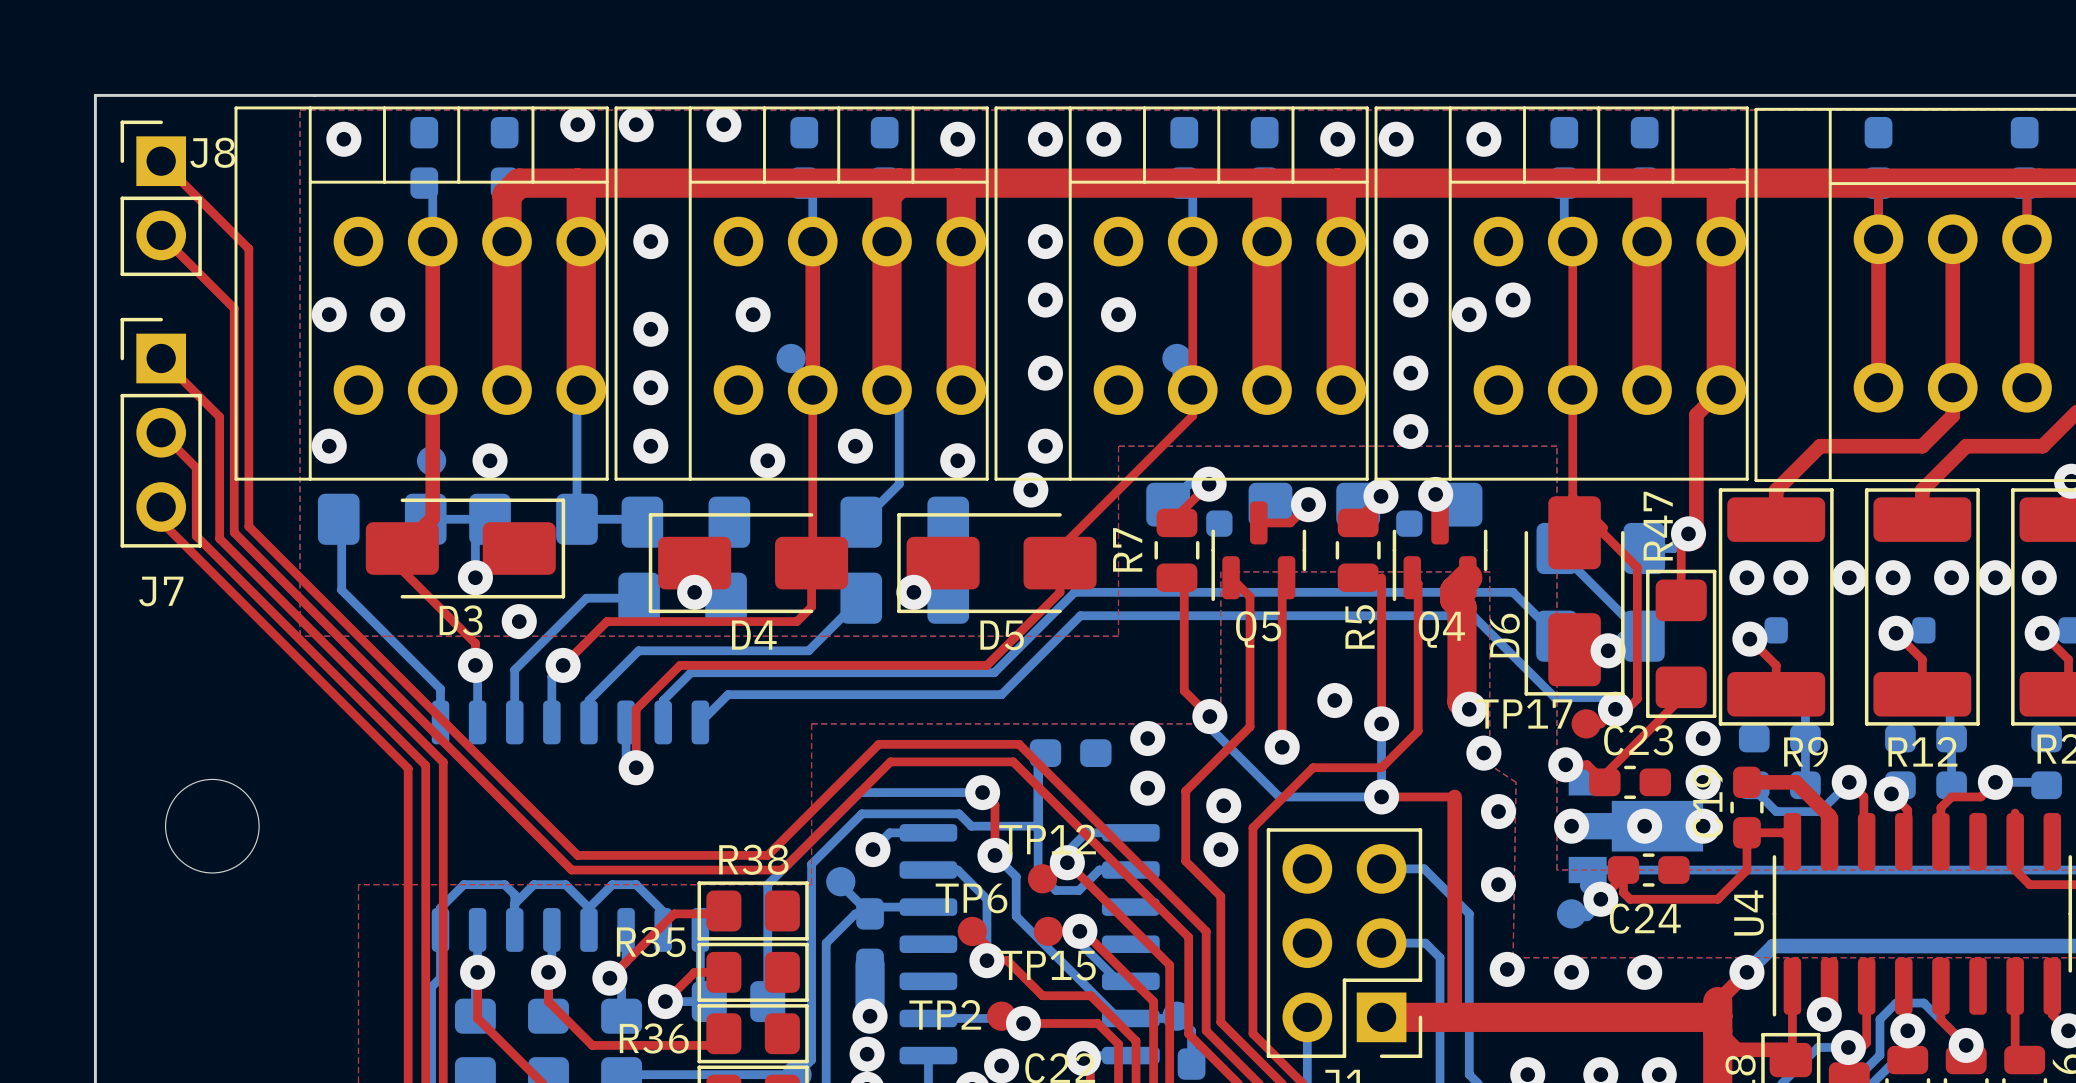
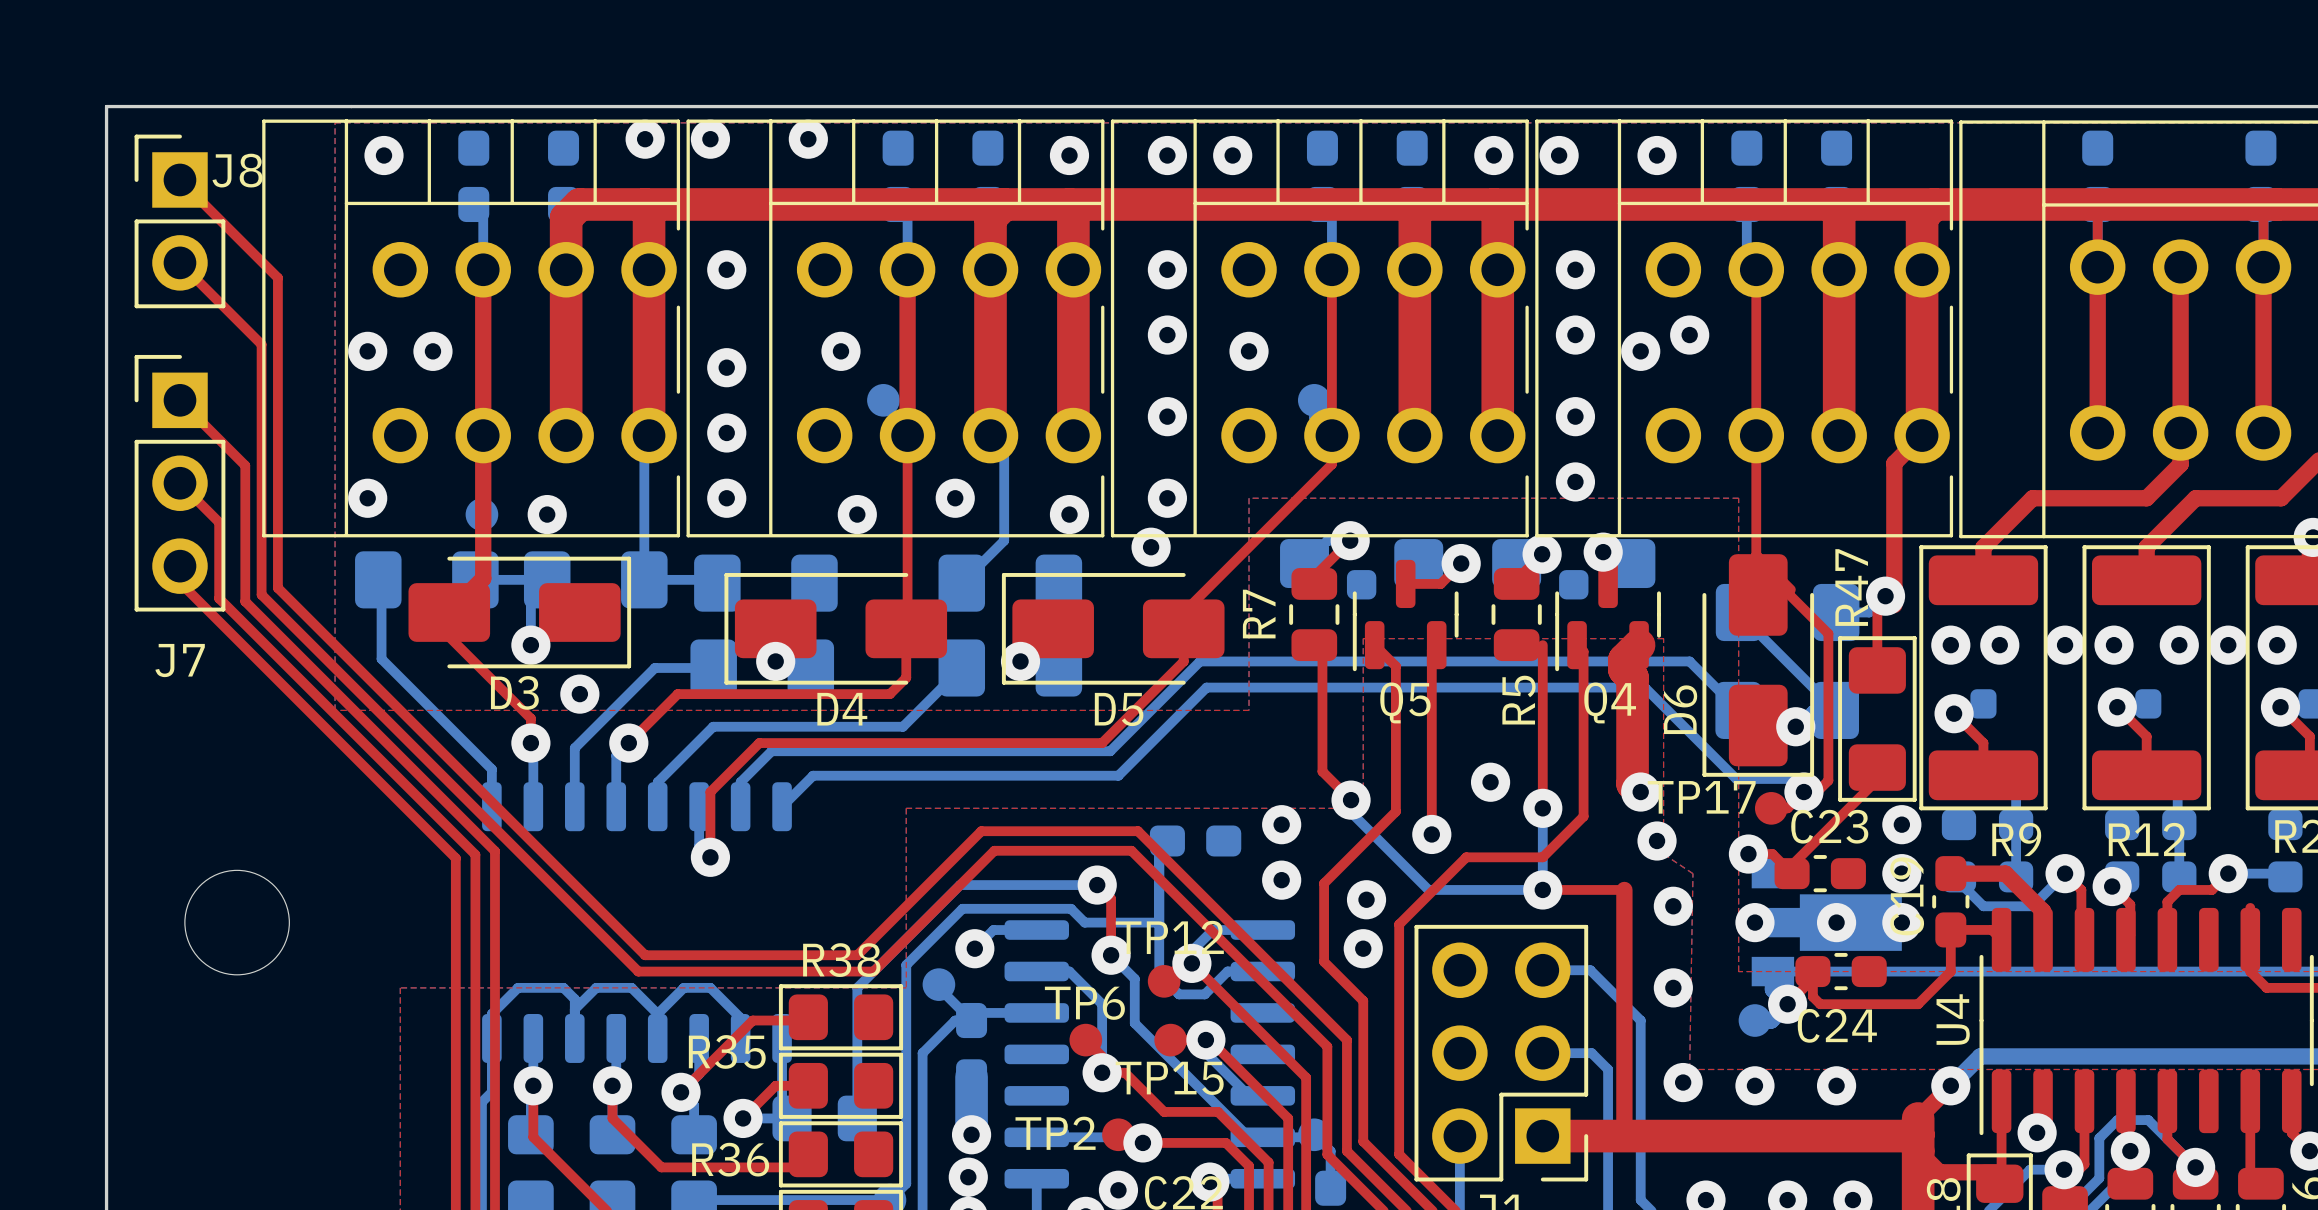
part footprint: [234, 106, 609, 481] -> [262, 118, 681, 538]
part footprint: [614, 106, 989, 481] -> [686, 118, 1105, 538]
part footprint: [994, 106, 1369, 481] -> [1110, 118, 1529, 538]
part footprint: [1374, 106, 1749, 481] -> [1535, 118, 1954, 538]

